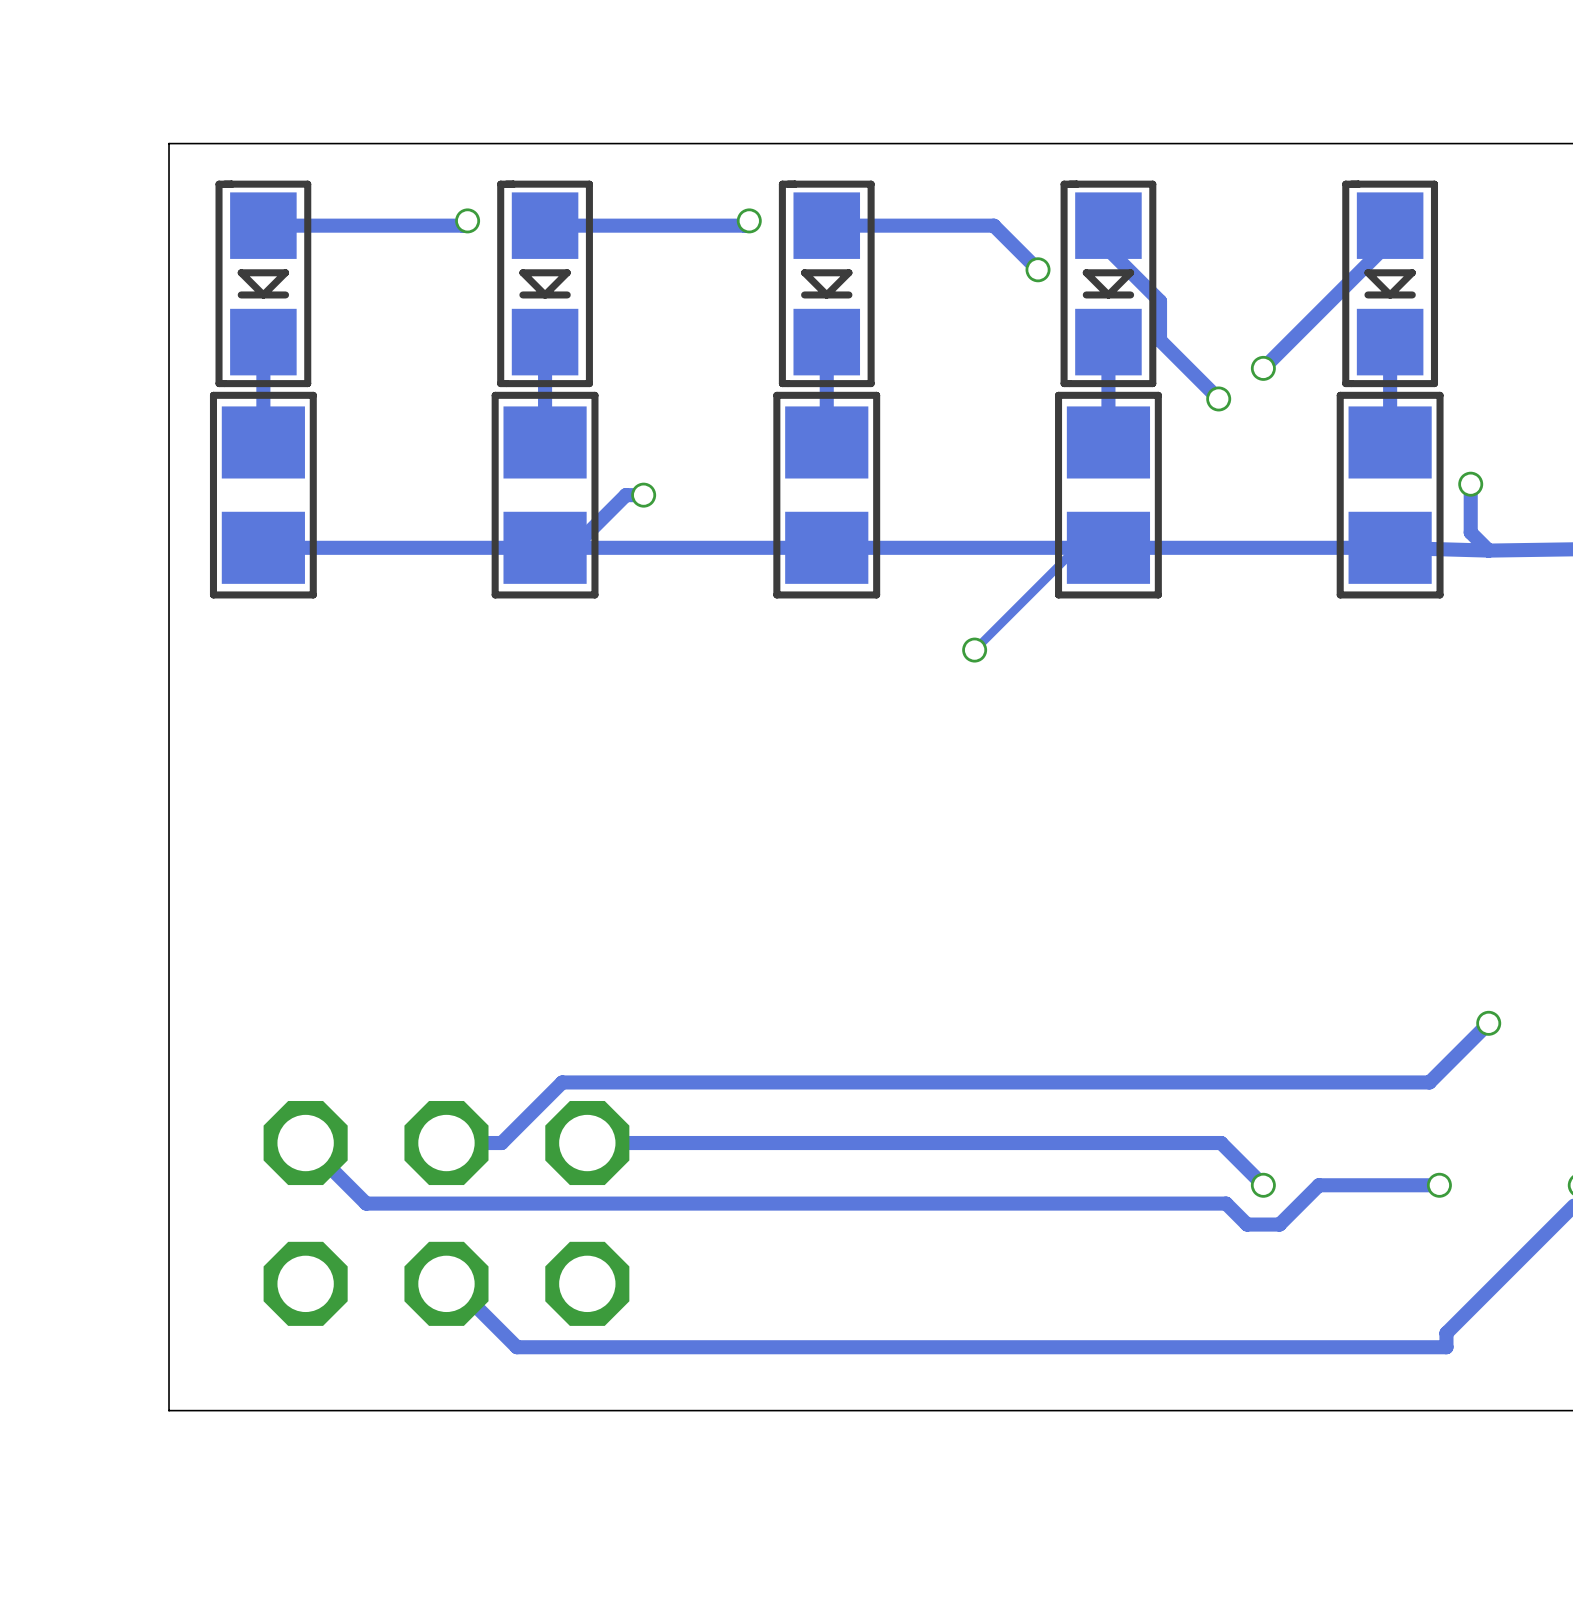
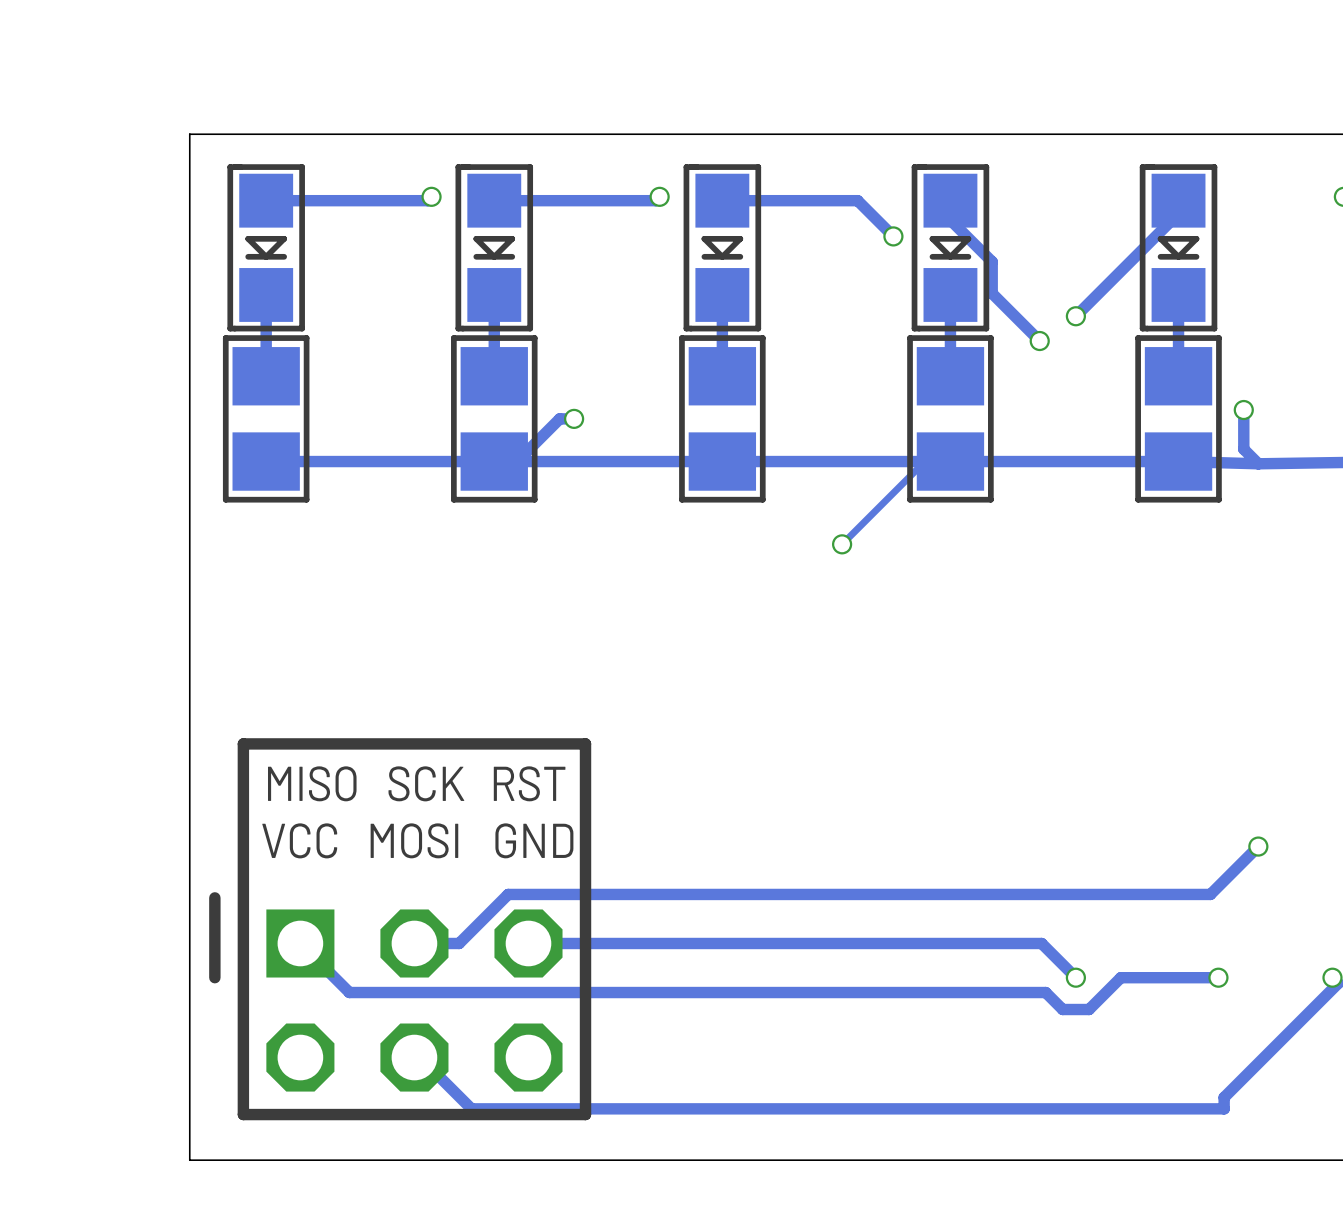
line: none -> (585, 743) (585, 1114) (243, 1114) (243, 743) (585, 743)
text: none -> MISO (312, 783)
text: none -> SCK (426, 783)
text: none -> RST (529, 783)
text: none -> VCC (299, 840)
text: none -> MOSI (414, 840)
text: none -> GND (534, 840)
line: none -> (214, 897) (214, 977)
part footprint: [263, 1100, 630, 1326] -> [266, 909, 563, 1092]

